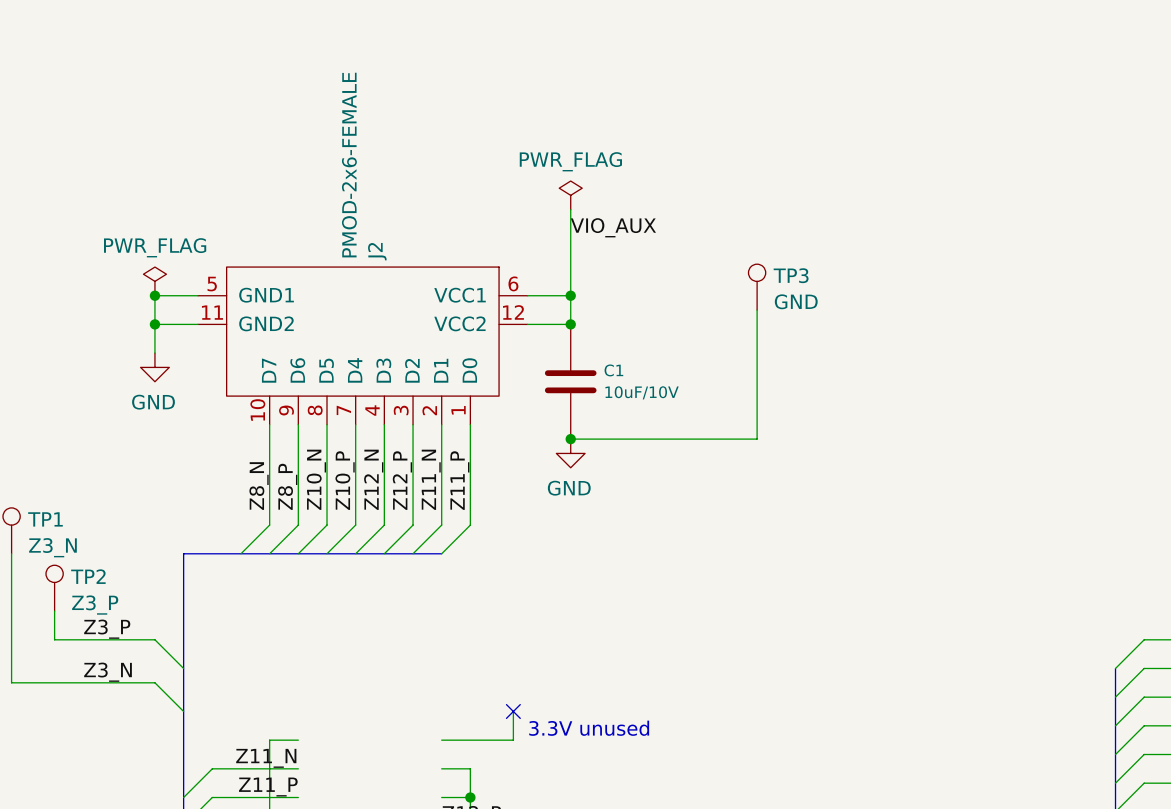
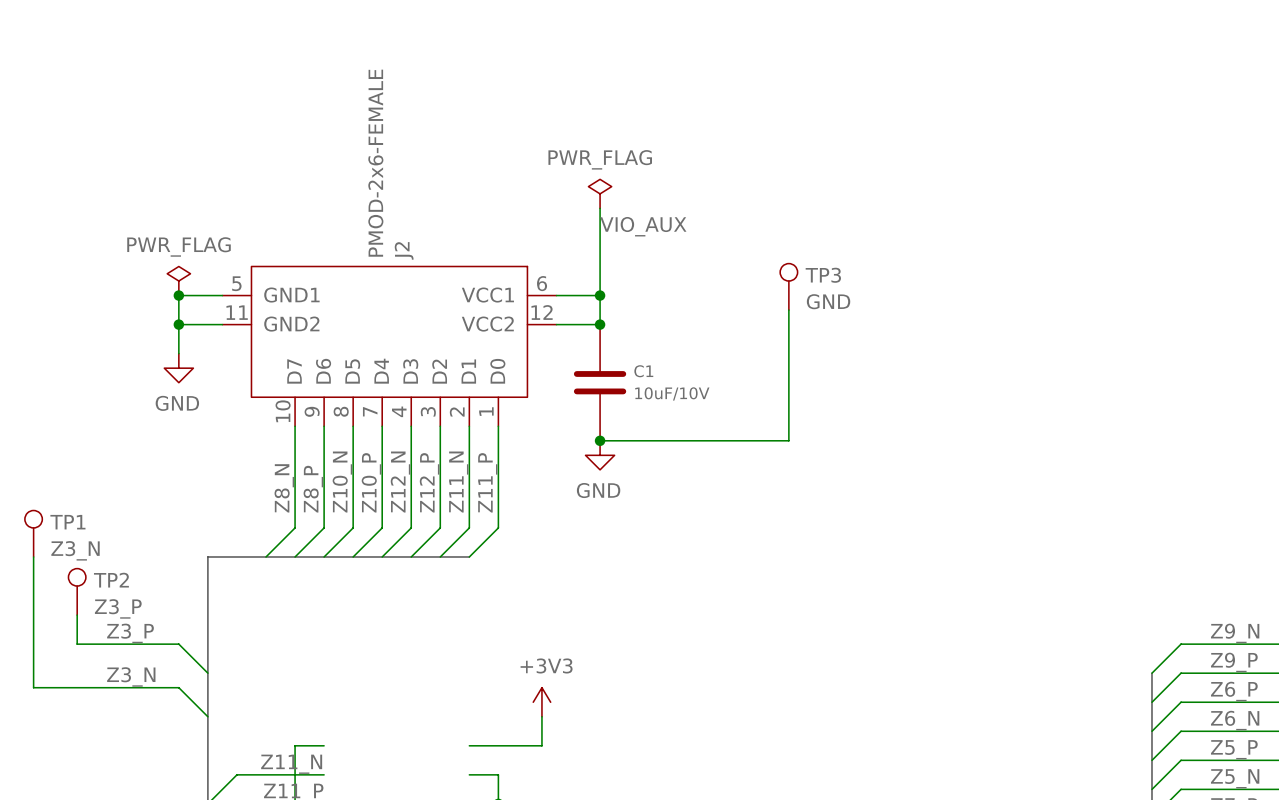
power symbol: none -> +3V3 (541, 702)
no-connect mark: (513, 711) -> none
text: 3.3V unused (589, 728) -> none

